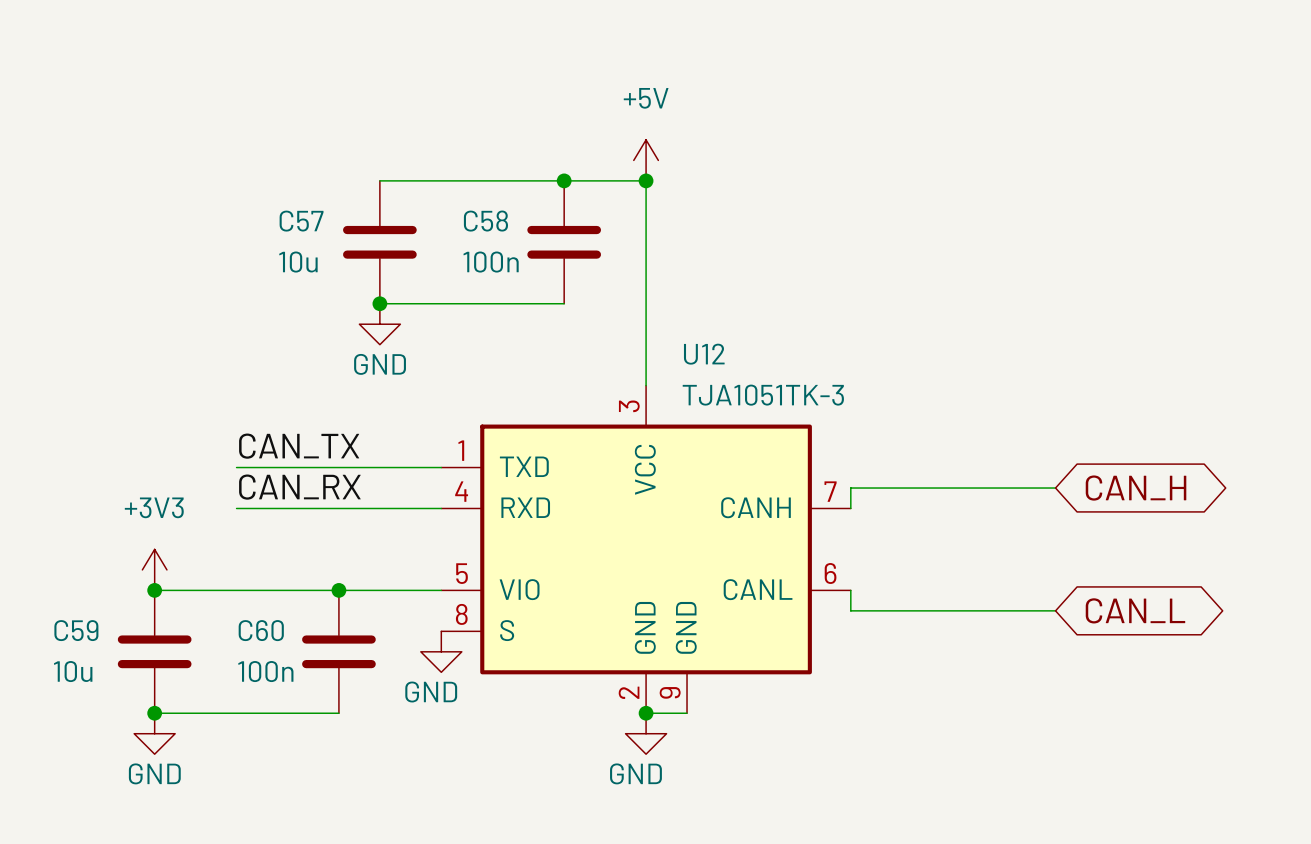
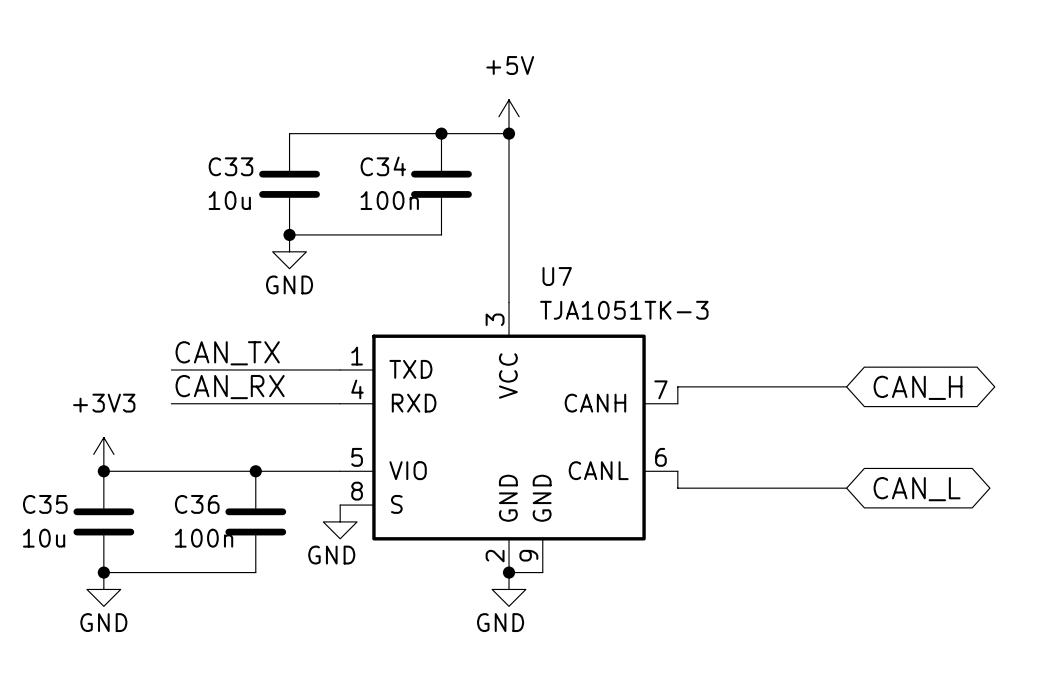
C57 name: C57 (301, 221) -> C33 (230, 166)
C58 name: C58 (485, 221) -> C34 (383, 166)
U12 name: U12 (704, 354) -> U7 (557, 276)
C59 name: C59 (76, 630) -> C35 (45, 504)
C60 name: C60 (261, 630) -> C36 (197, 504)

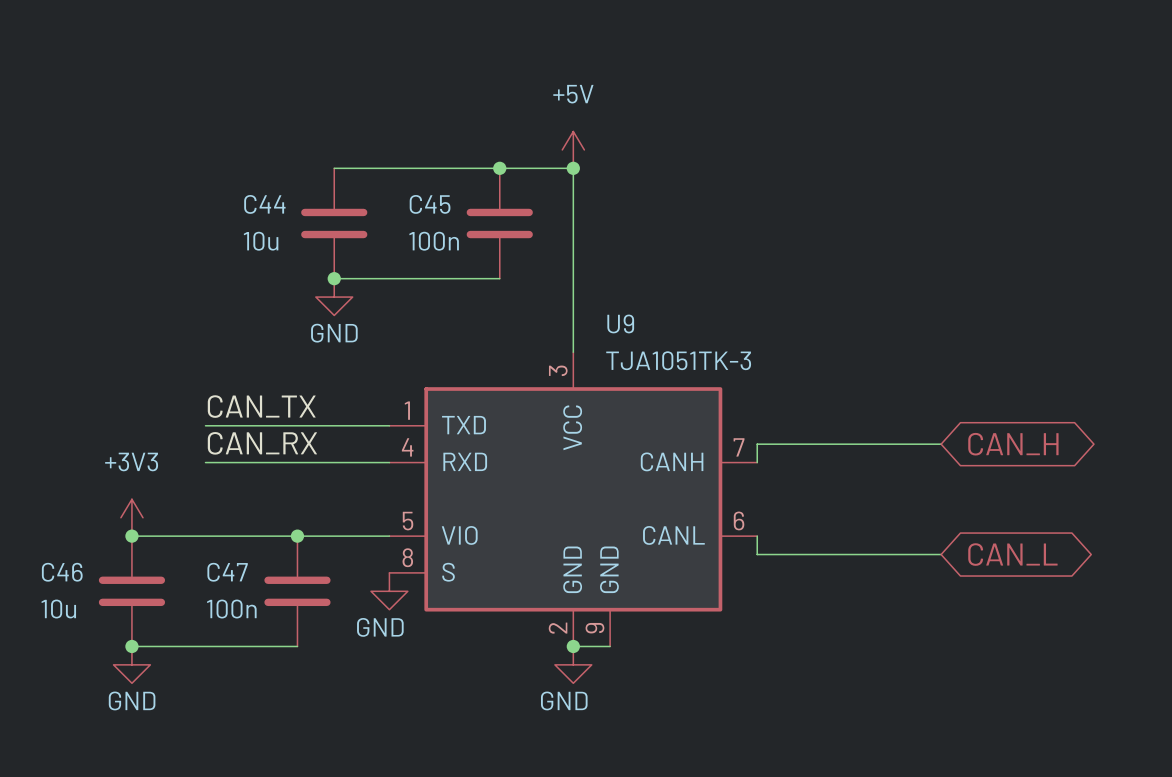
C33 name: C33 (230, 166) -> C44 (264, 204)
C34 name: C34 (383, 166) -> C45 (430, 204)
U7 name: U7 (557, 276) -> U9 (620, 323)
C35 name: C35 (45, 504) -> C46 (62, 572)
C36 name: C36 (197, 504) -> C47 (227, 572)

